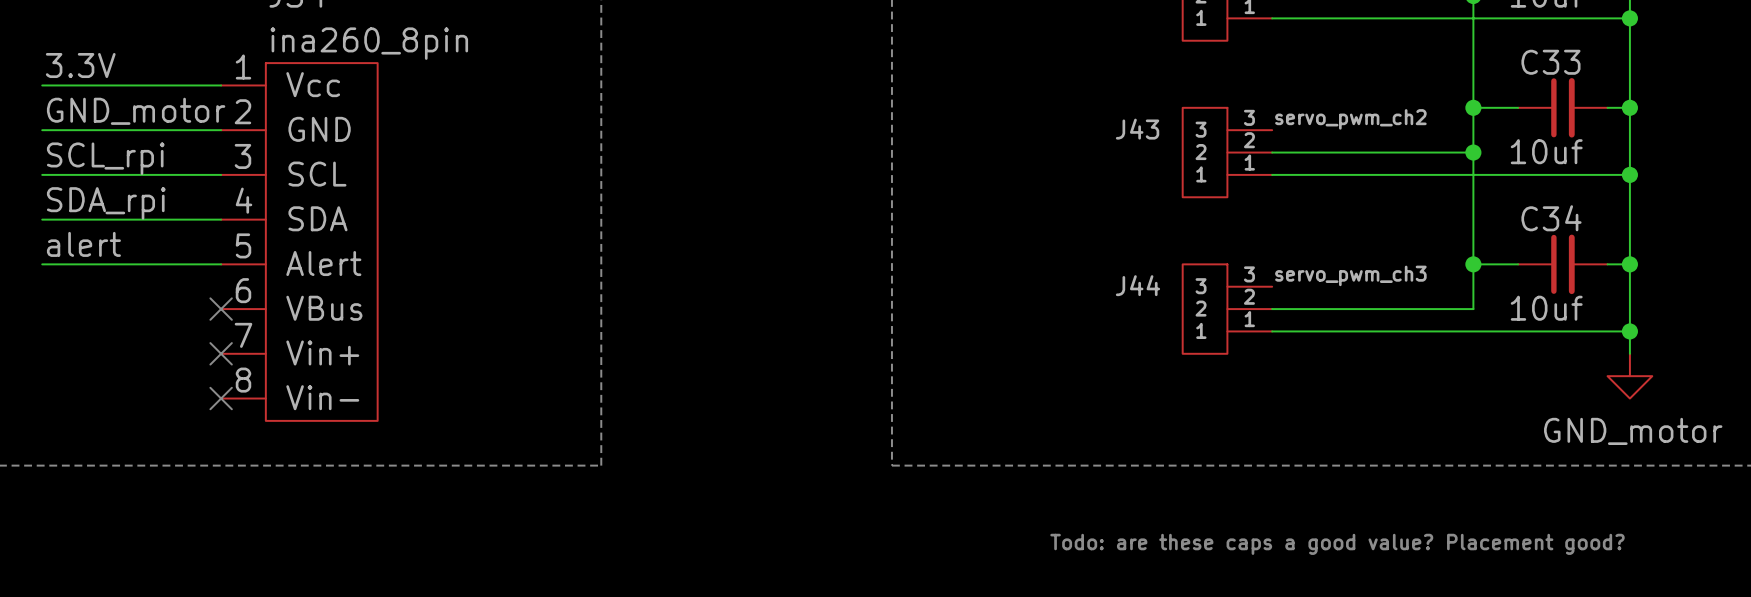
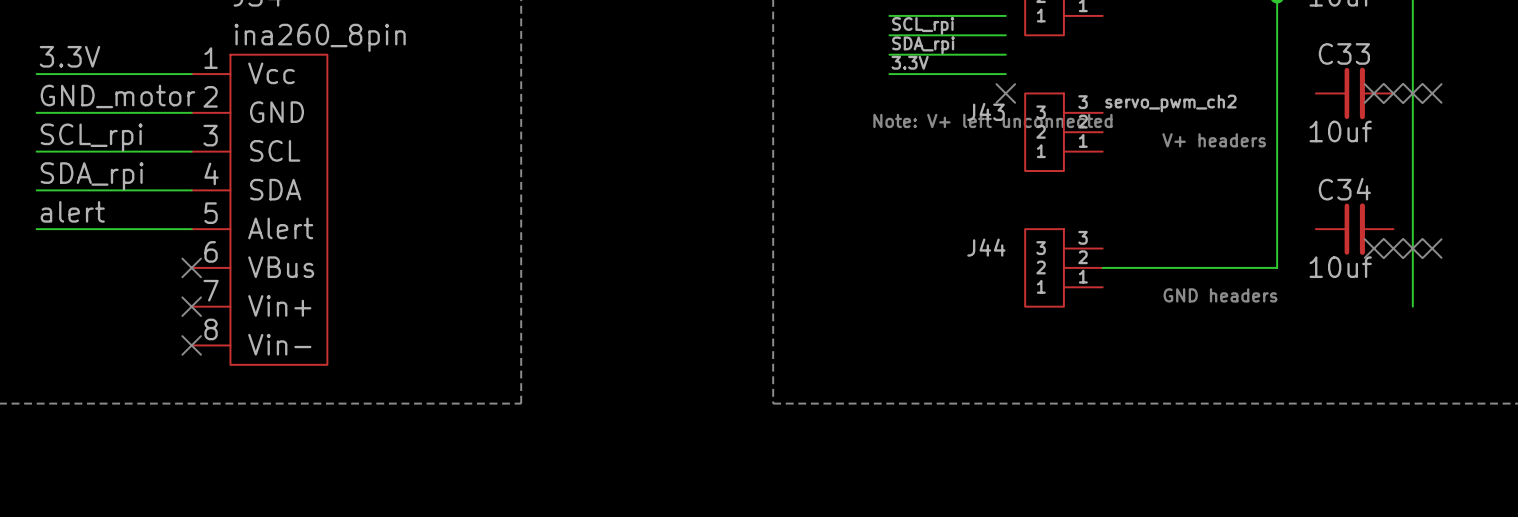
wire: none -> (889, 15) (1005, 15)
wire: (1272, 18) (1629, 18) -> none
junction: (1629, 18) -> none
label: none -> SCL_rpi (923, 25)
wire: none -> (889, 35) (1005, 35)
label: none -> SDA_rpi (923, 45)
wire: none -> (889, 54) (1005, 54)
label: none -> 3.3V (910, 62)
wire: none -> (889, 74) (1005, 74)
no-connect mark: none -> (1005, 93)
wire: (1473, 107) (1518, 107) -> none
junction: (1473, 107) -> none
no-connect mark: none -> (1374, 93)
wire: (1607, 107) (1629, 107) -> none
no-connect mark: none -> (1393, 93)
junction: (1629, 107) -> none
no-connect mark: none -> (1412, 93)
no-connect mark: none -> (1432, 93)
text: none -> Note: V+ left unconnected (992, 120)
wire: (1272, 152) (1473, 152) -> none
junction: (1473, 152) -> none
text: none -> V+ headers (1214, 140)
wire: (1272, 174) (1629, 174) -> none
junction: (1629, 174) -> none
wire: (1473, 264) (1518, 264) -> none
junction: (1473, 264) -> none
wire: (1607, 264) (1629, 264) -> none
junction: (1629, 264) -> none
label: servo_pwm_ch3 (1350, 275) -> none
no-connect mark: none -> (1374, 248)
no-connect mark: none -> (1393, 248)
no-connect mark: none -> (1412, 248)
no-connect mark: none -> (1432, 248)
wire: (1272, 331) (1629, 331) -> none
junction: (1629, 331) -> none
text: none -> GND headers (1220, 295)
power symbol: GND_motor (1629, 376) -> none
text: Todo: are these caps a good value? Placement good? (1337, 544) -> none

